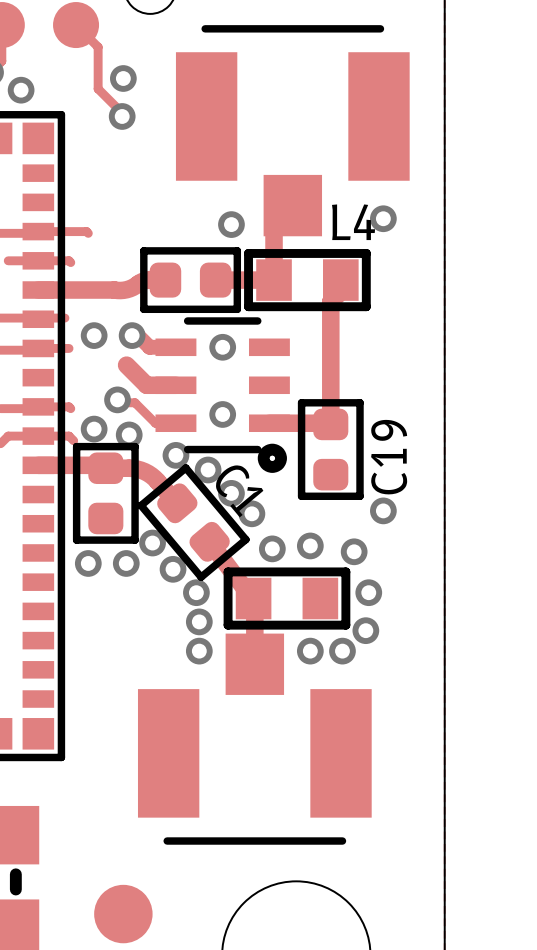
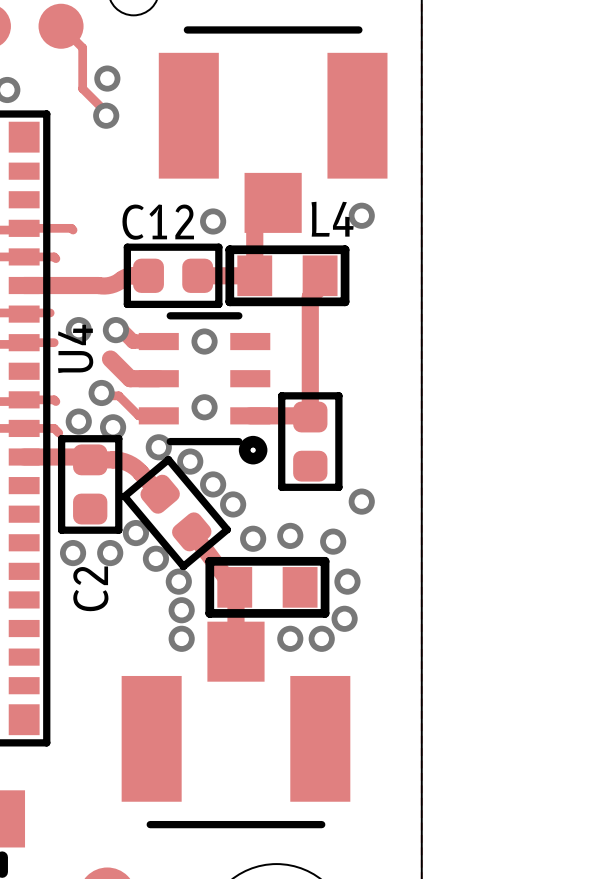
C12 name: none -> C12 (158, 222)
U4 name: none -> U4 (75, 348)
C19 name: C19 (389, 457) -> none
C1 name: C1 (239, 491) -> none
C2 name: none -> C2 (90, 588)

